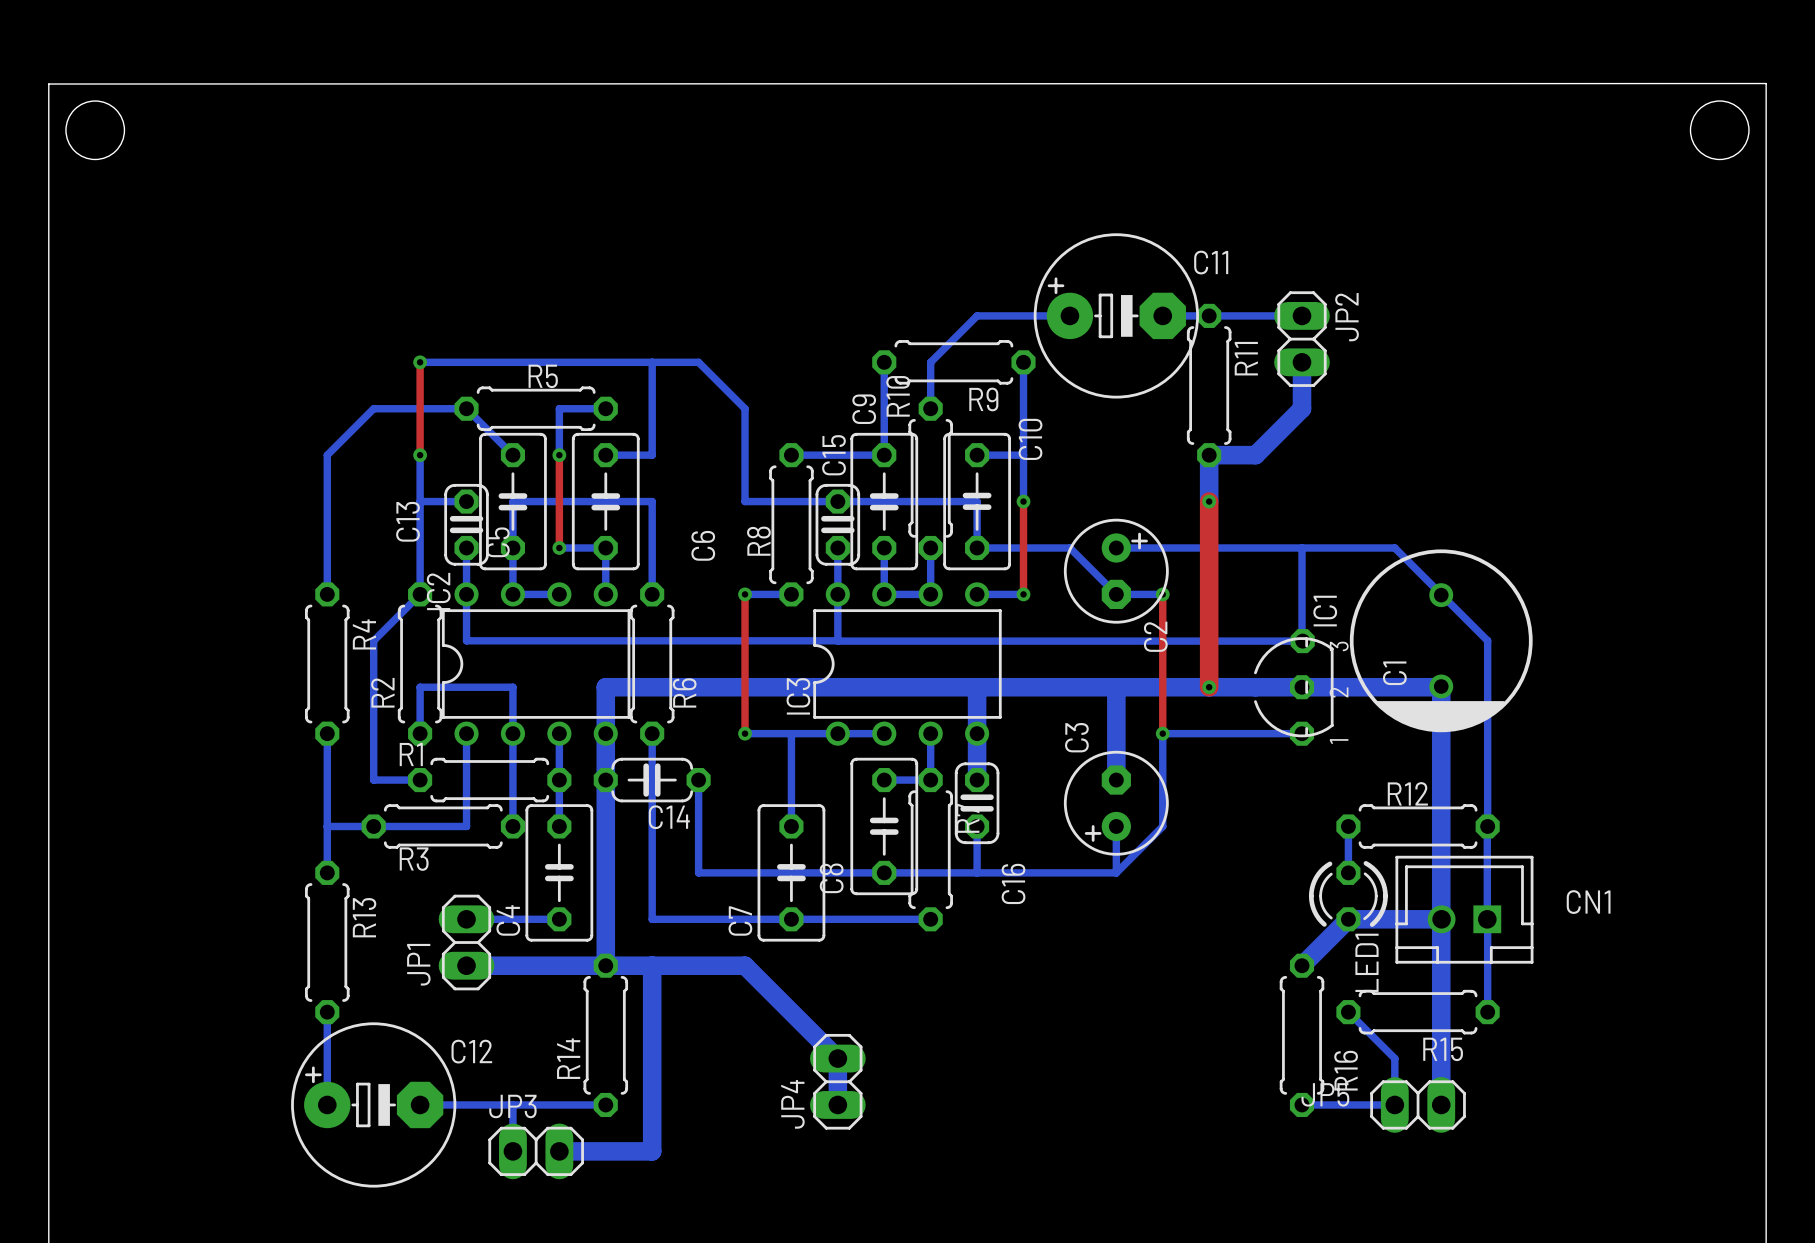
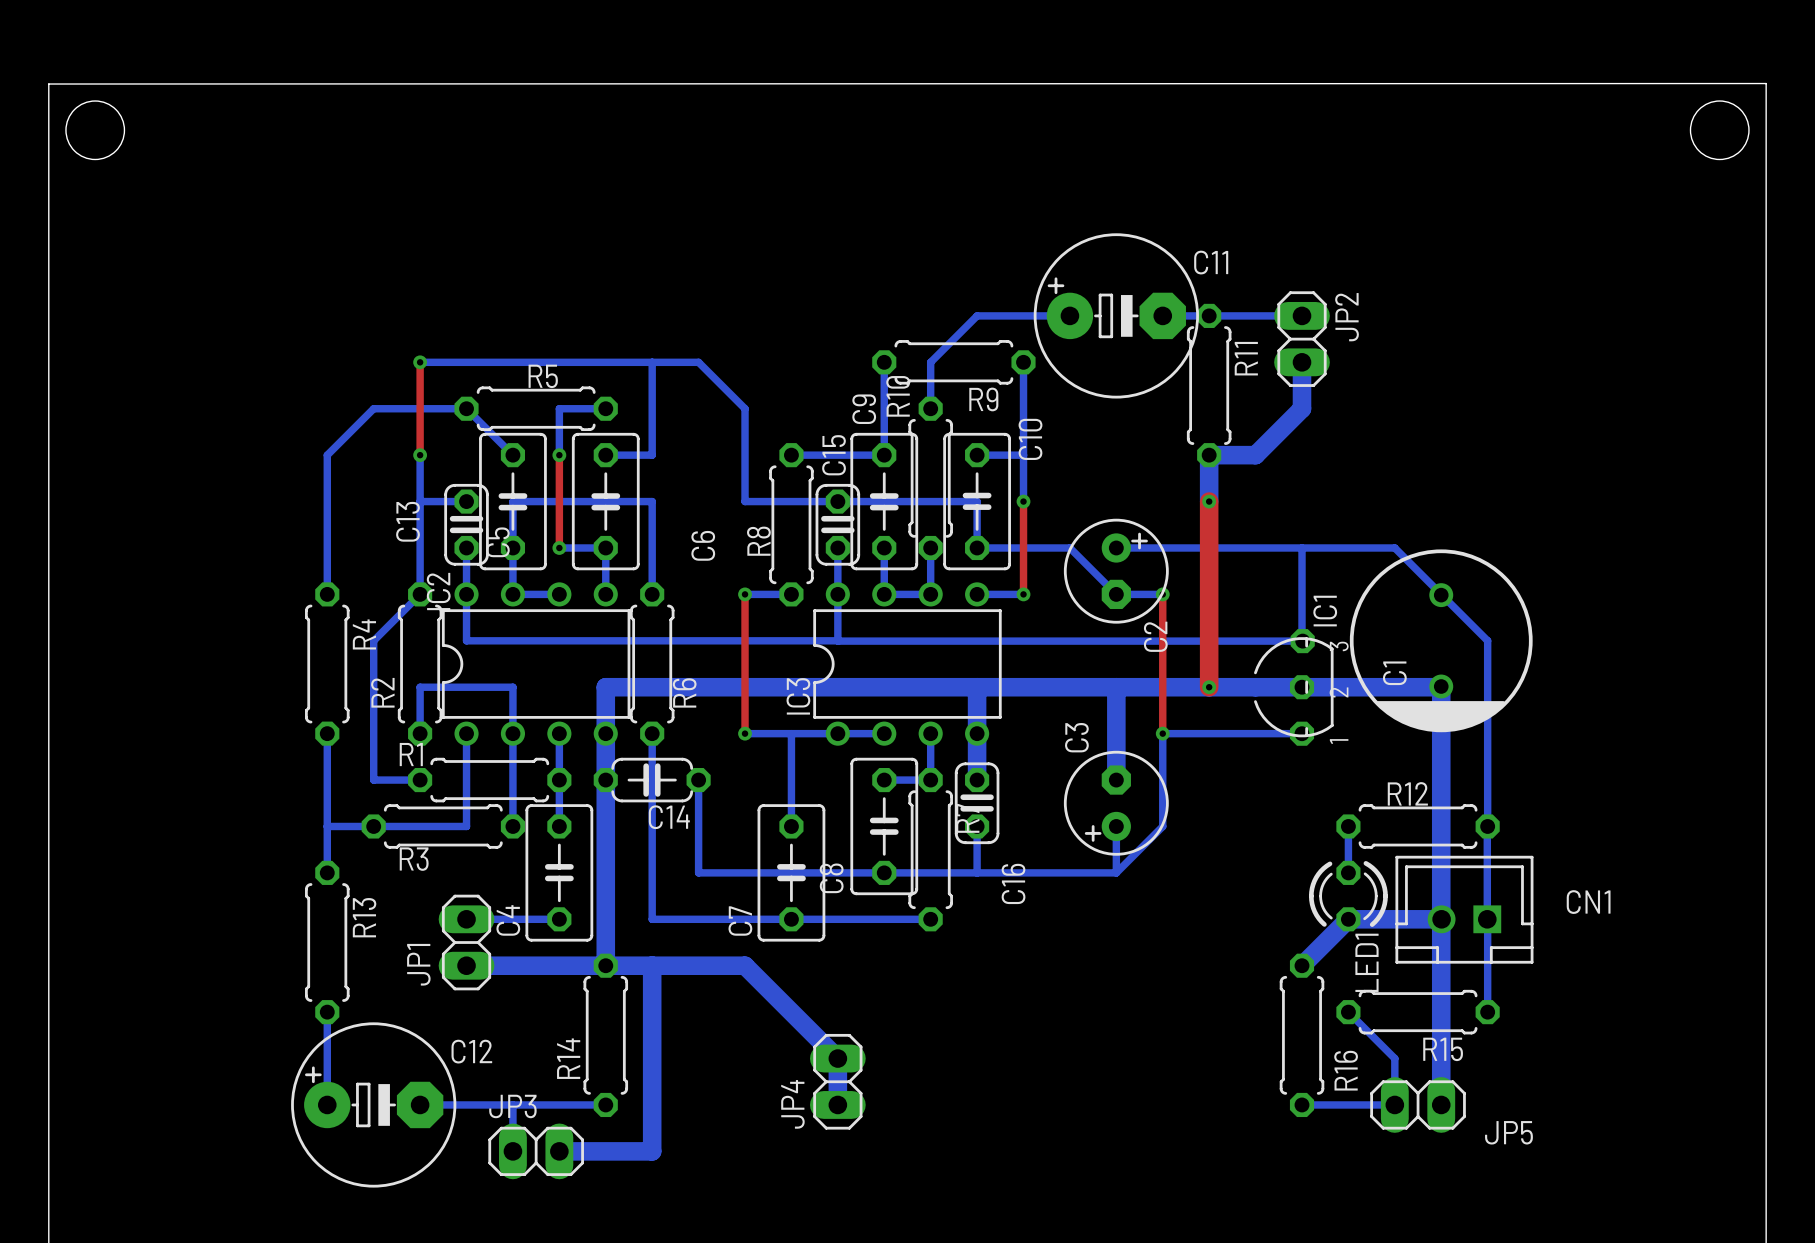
JP5 name position: JP5 (1325, 1094) -> JP5 (1508, 1132)

